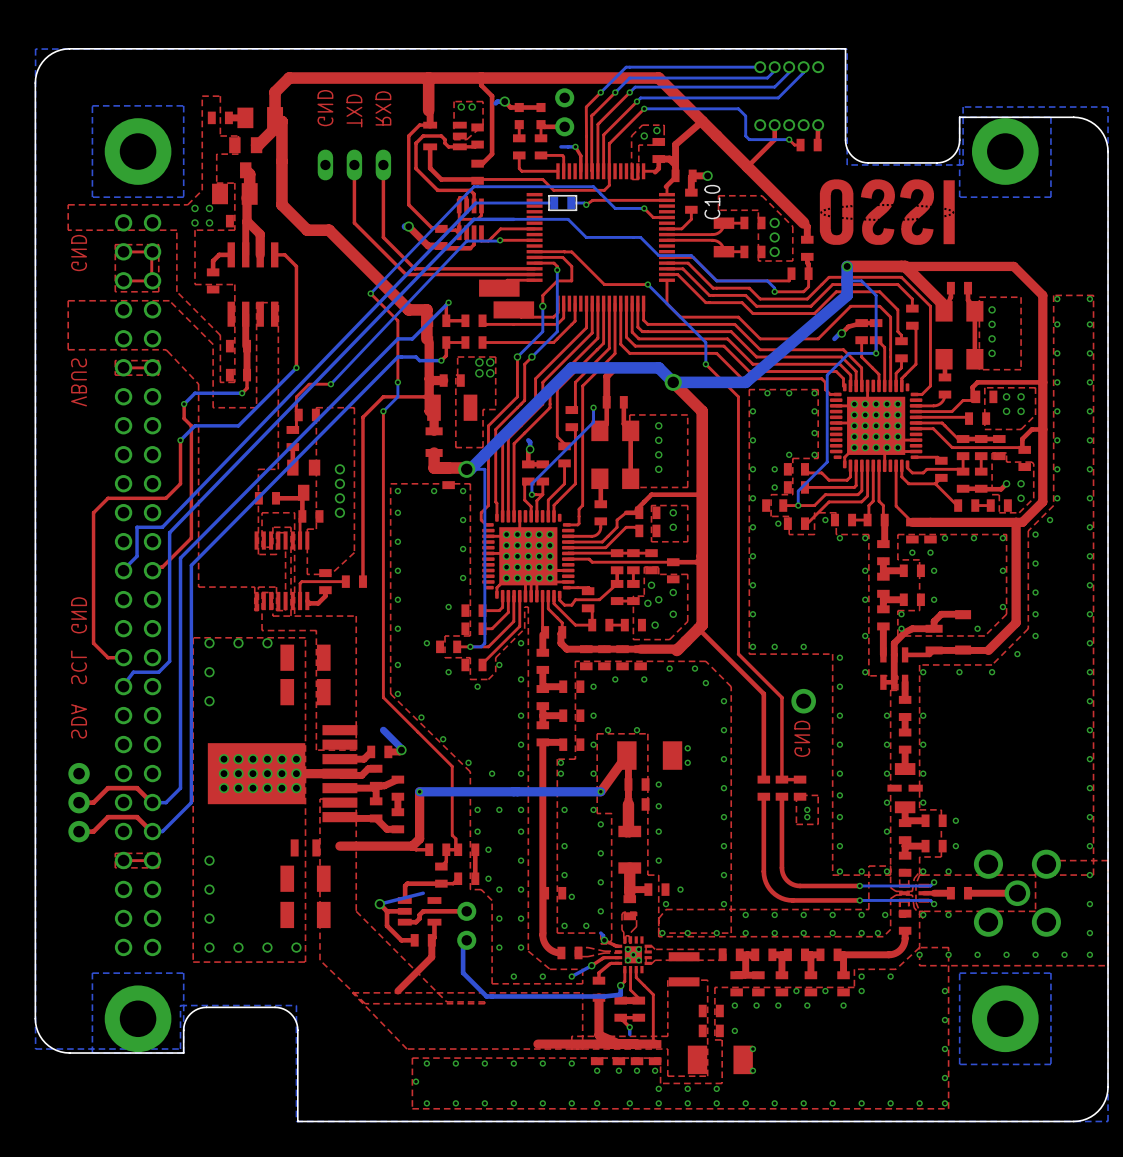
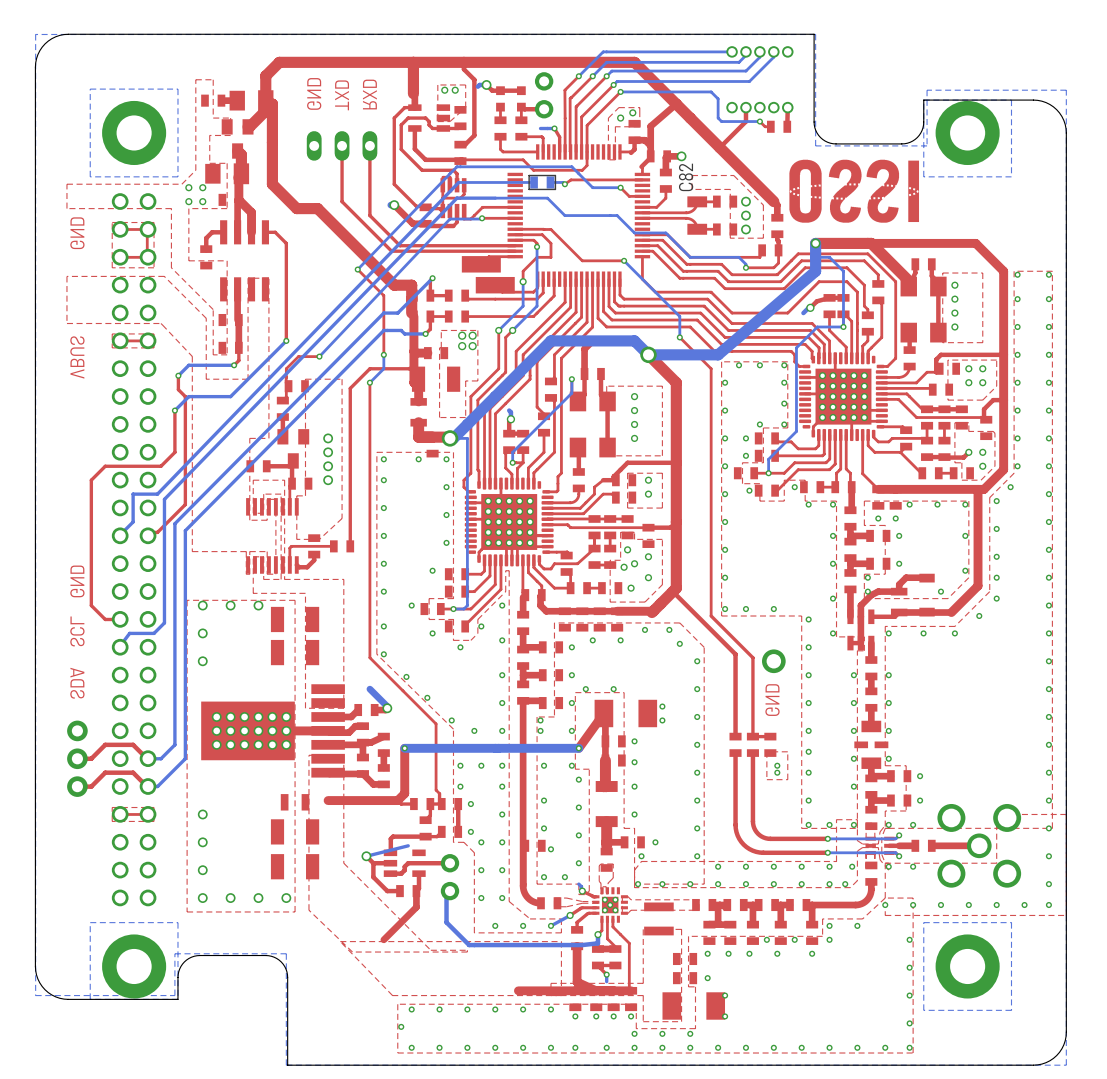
C10 name: C10 (712, 202) -> C82 (686, 177)

